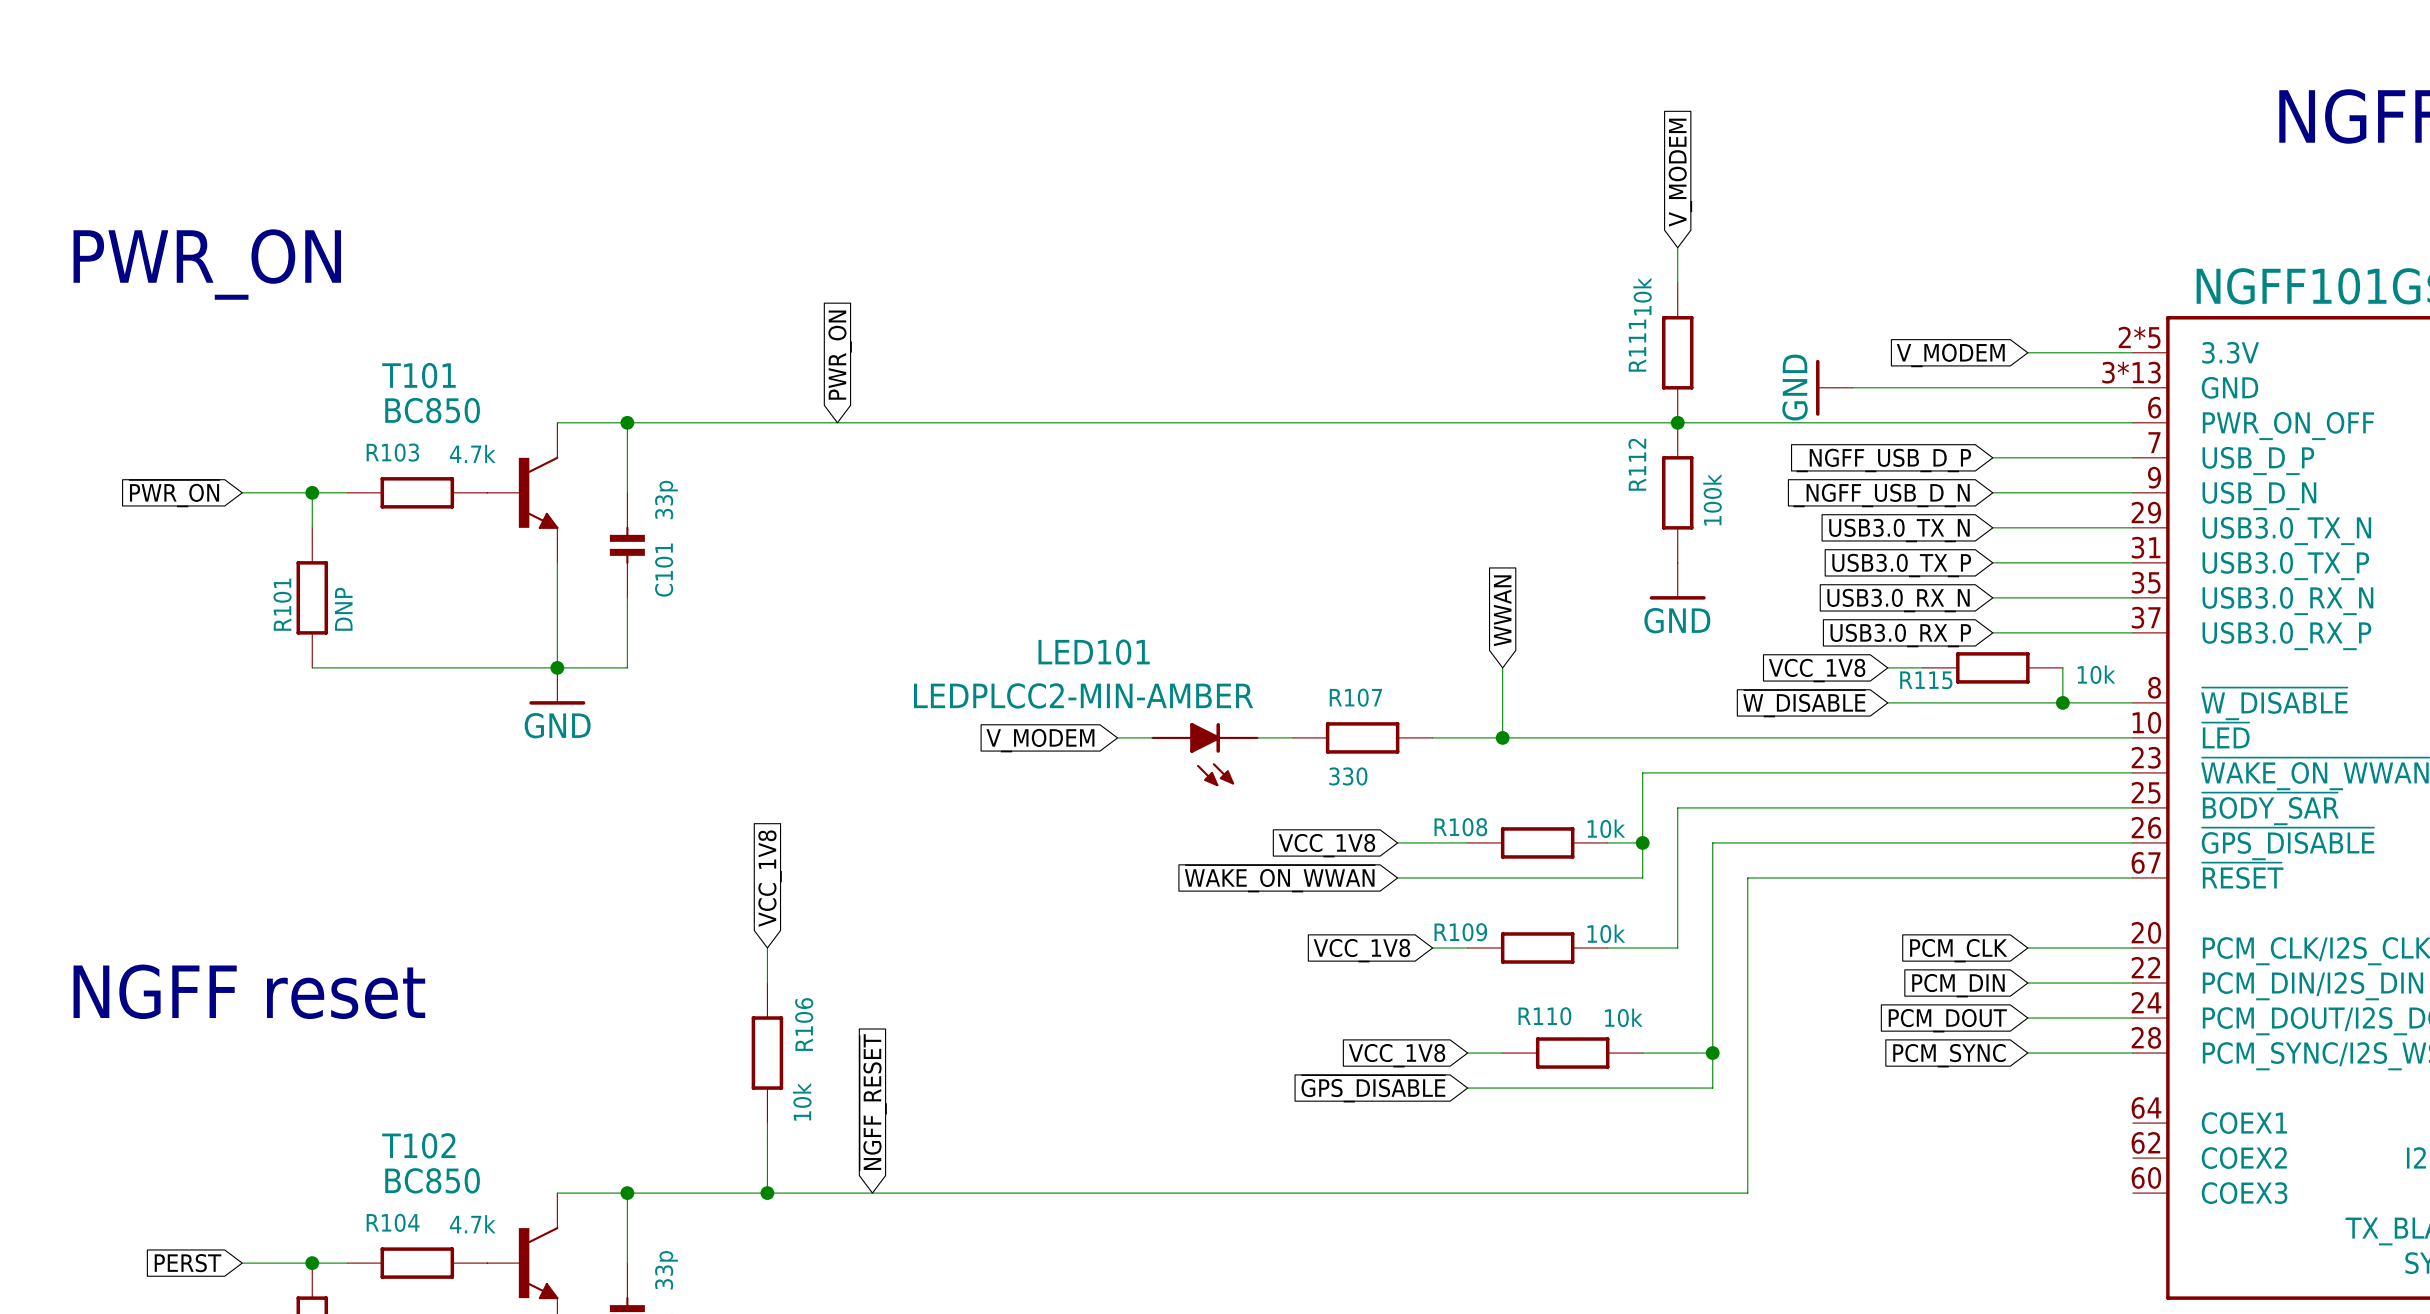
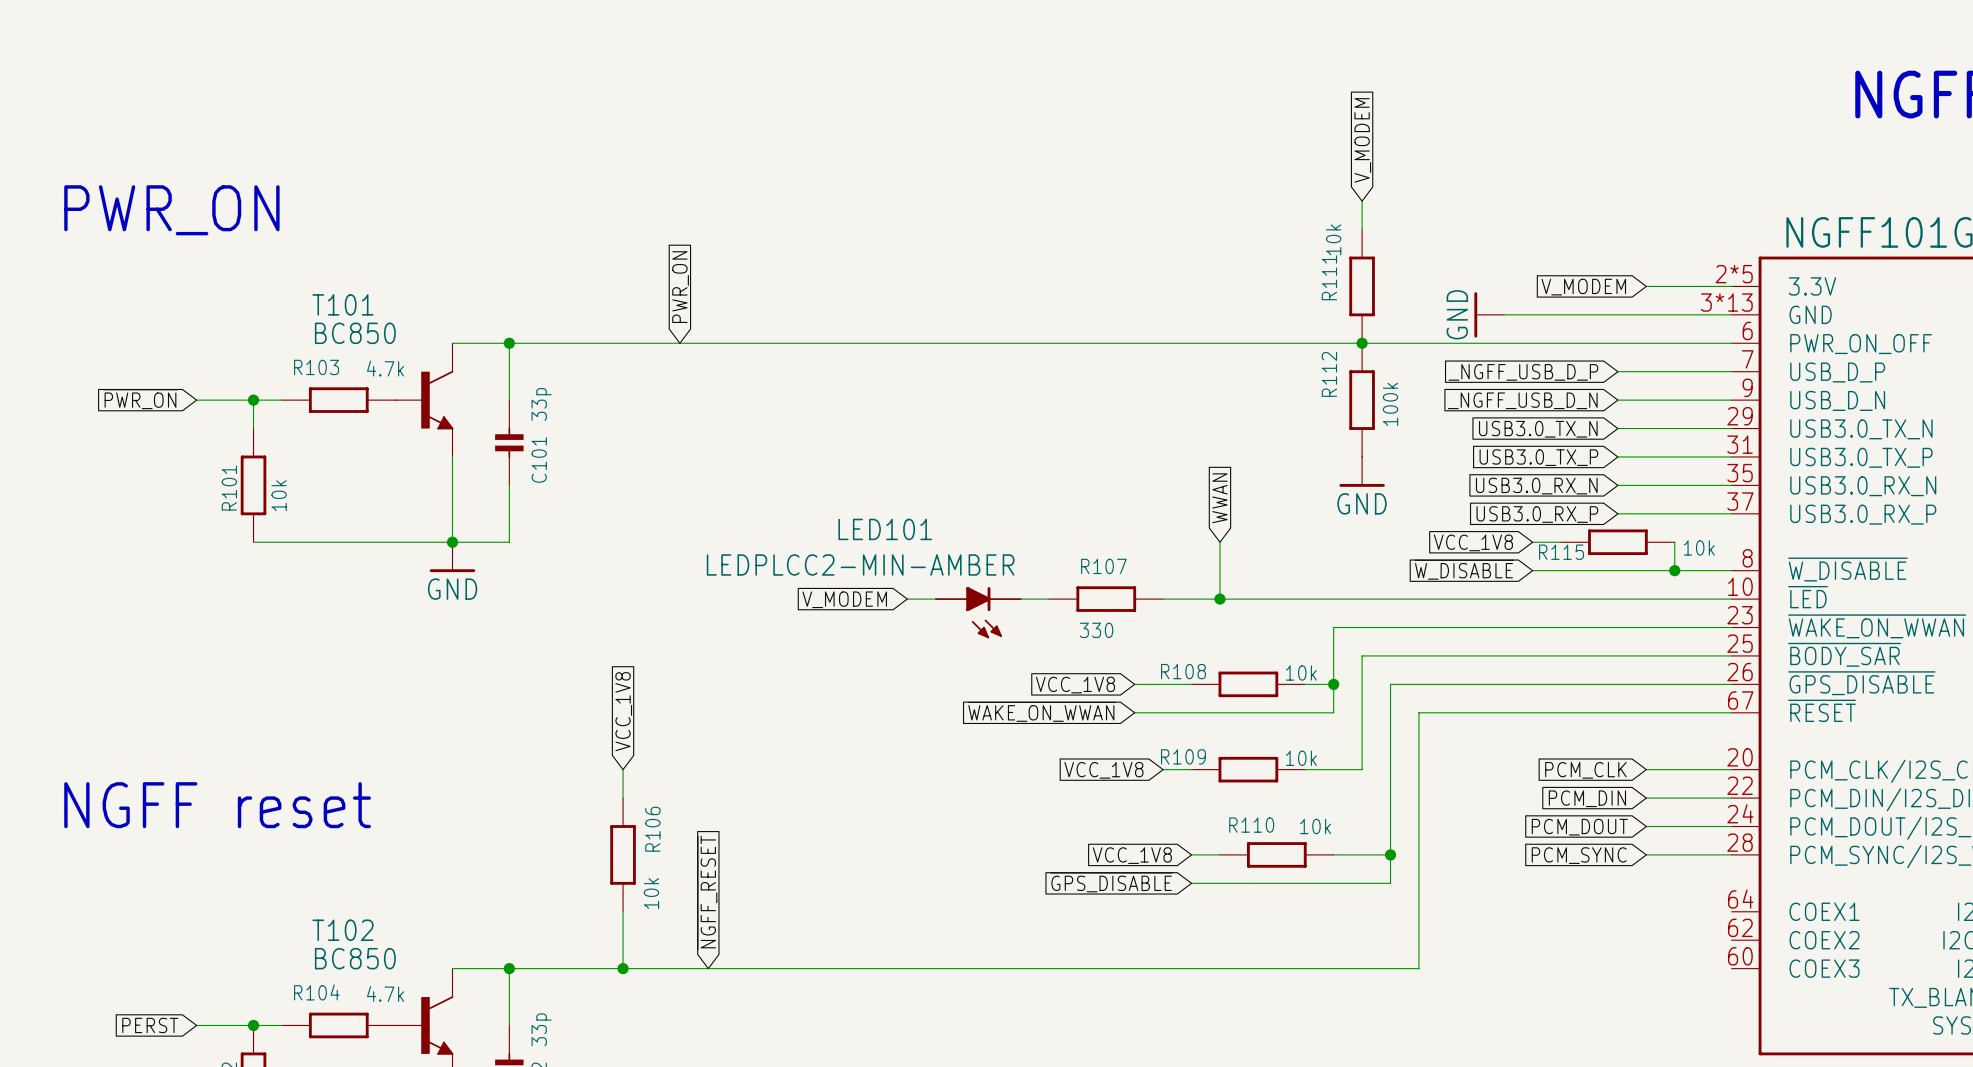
R101 value: DNP (343, 609) -> 10k (279, 495)

